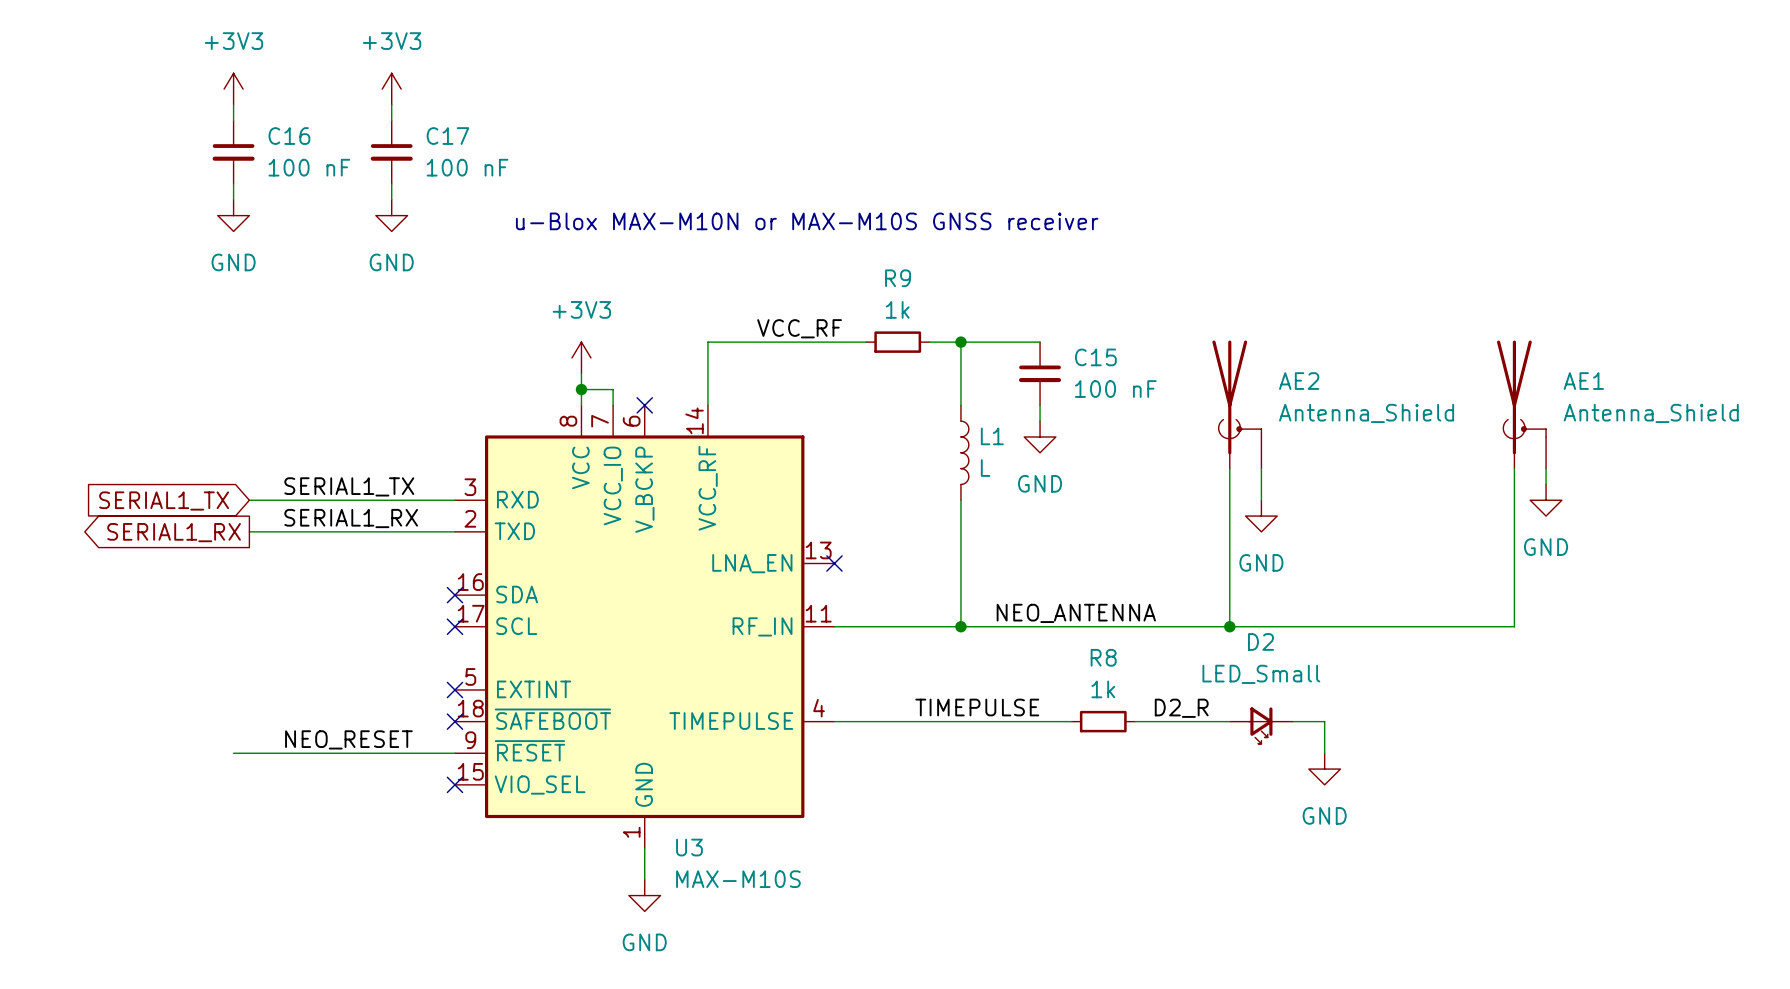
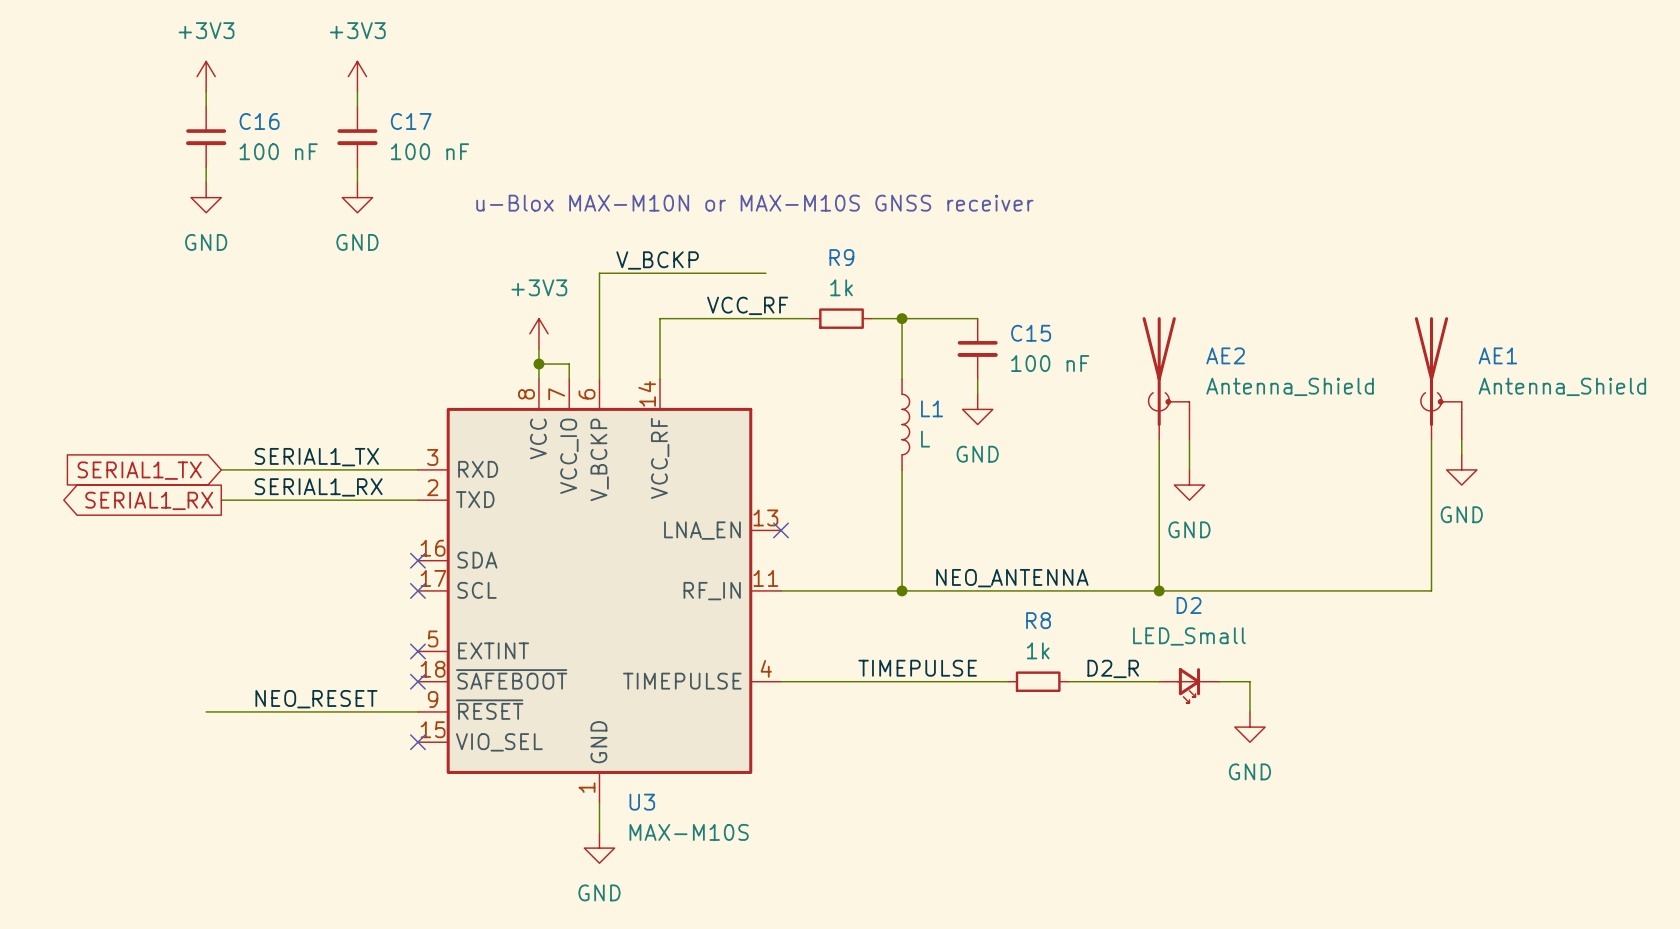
label: none -> V_BCKP (657, 260)
wire: none -> (765, 273) (599, 273) (599, 379)
no-connect mark: (644, 405) -> none

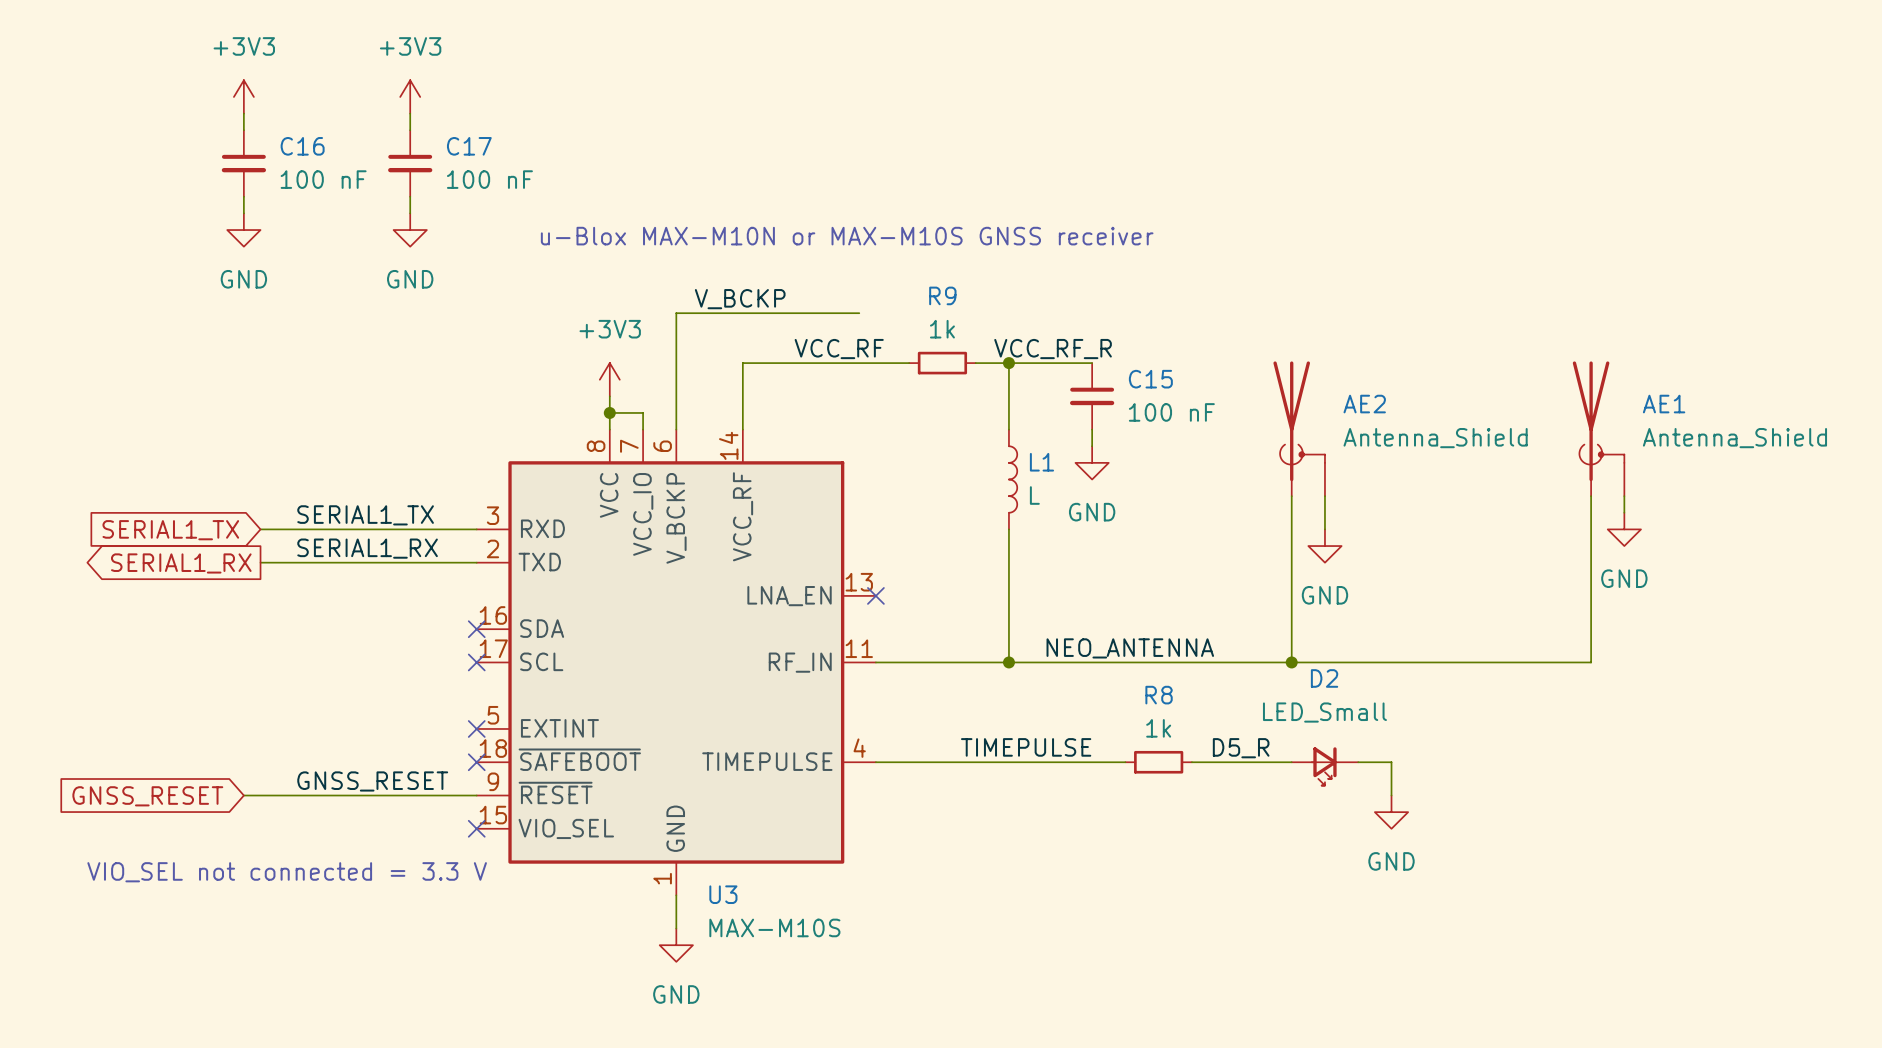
label: none -> VCC_RF_R (1053, 349)
label: D2_R (1113, 668) -> D5_R (1241, 748)
label: NEO_RESET (316, 699) -> GNSS_RESET (372, 781)
global label: none -> GNSS_RESET (147, 796)
text: none -> VIO_SEL not connected = 3.3 V (287, 872)

